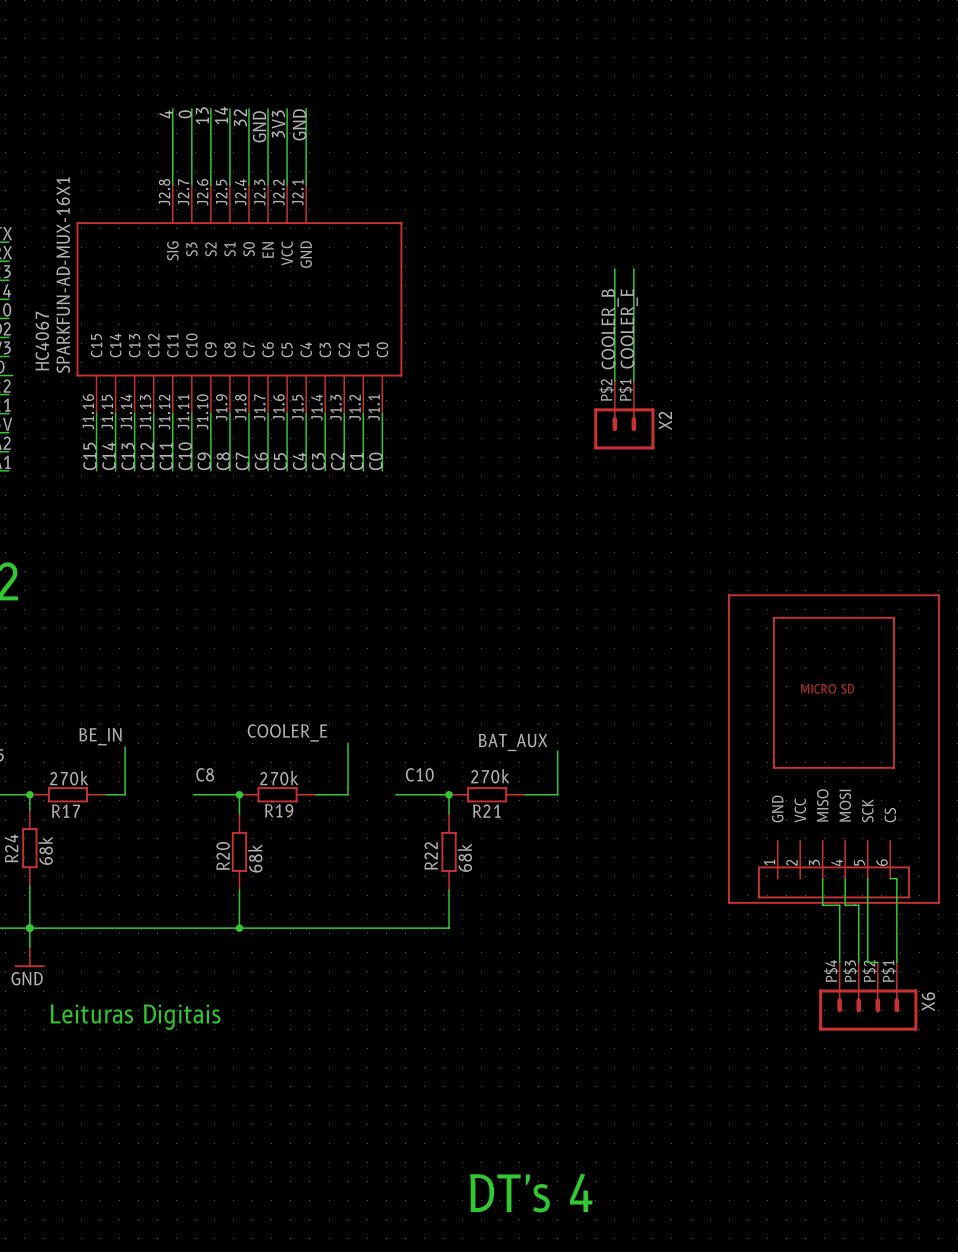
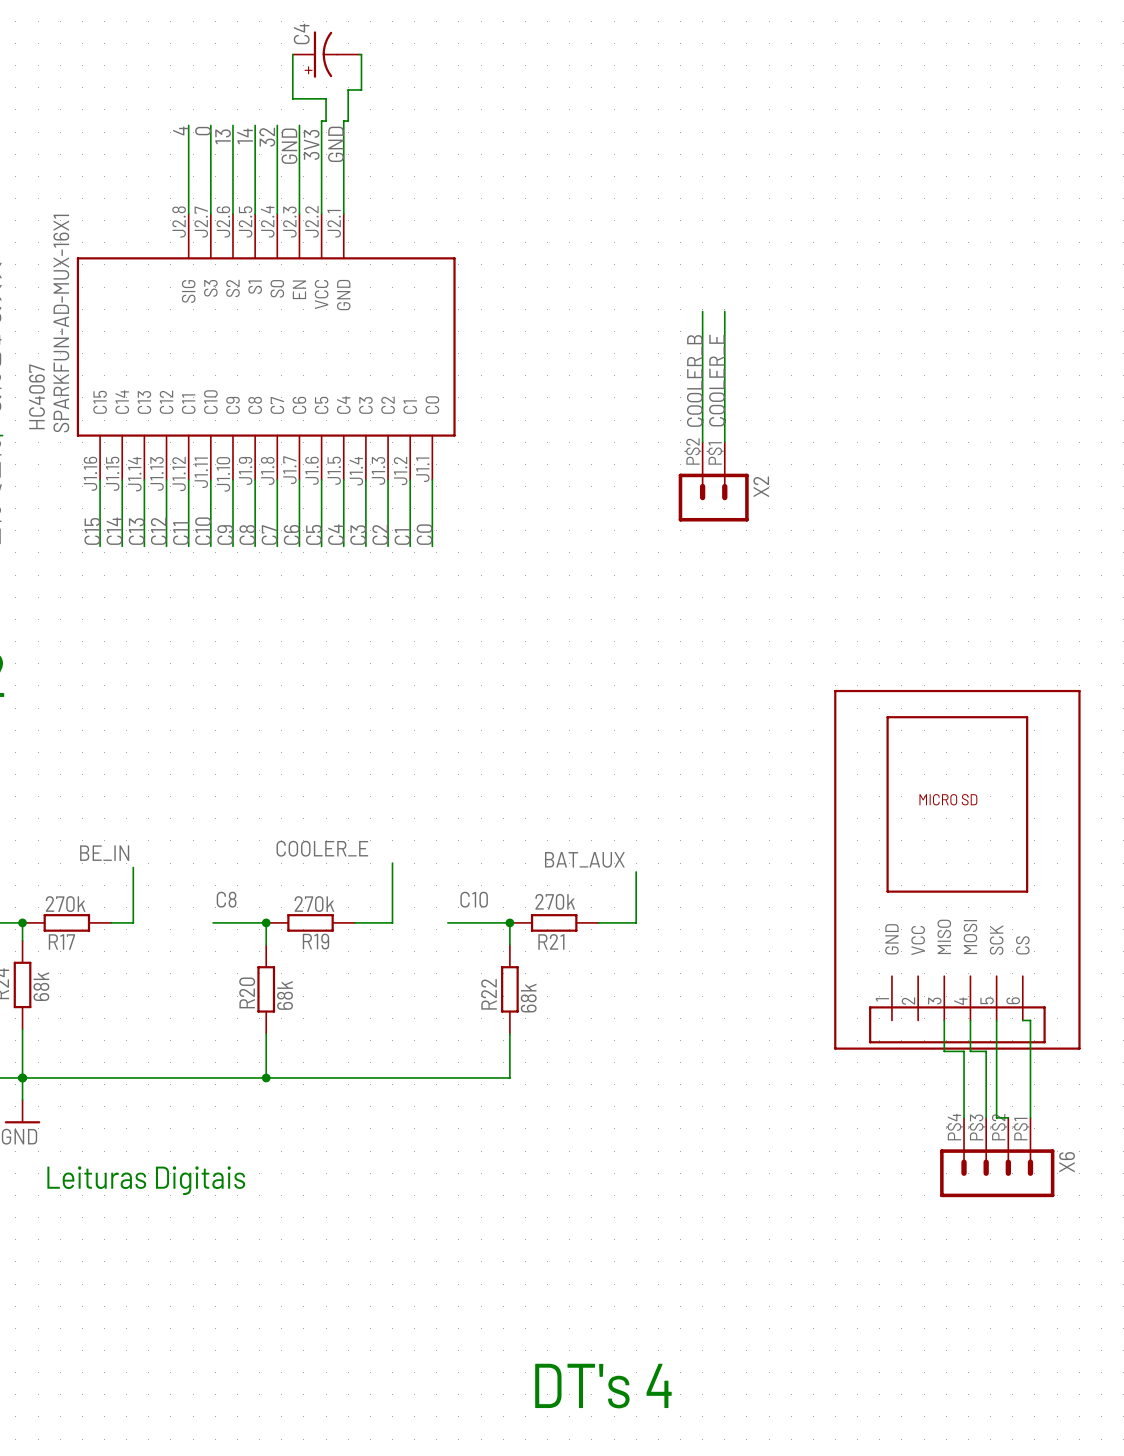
wire: none -> (292, 54) (292, 98) (326, 98) (326, 121) (321, 121) (321, 125)
C4: none -> (326, 54)
wire: none -> (359, 54) (361, 54) (361, 89) (348, 89) (348, 121) (343, 121) (343, 125)

